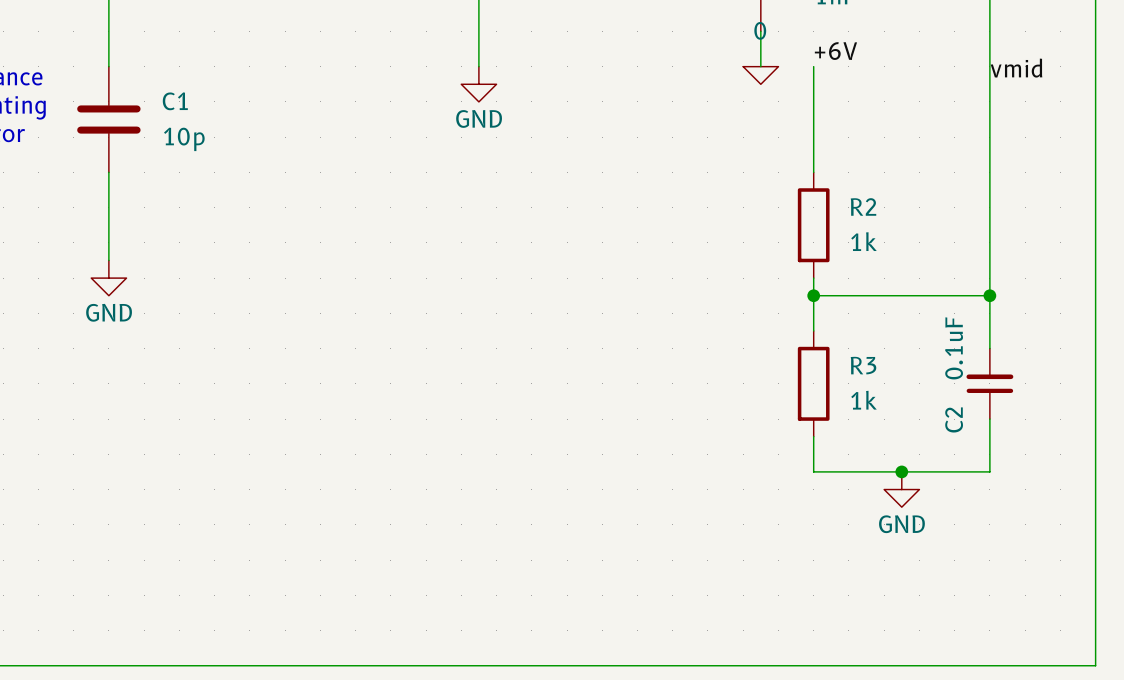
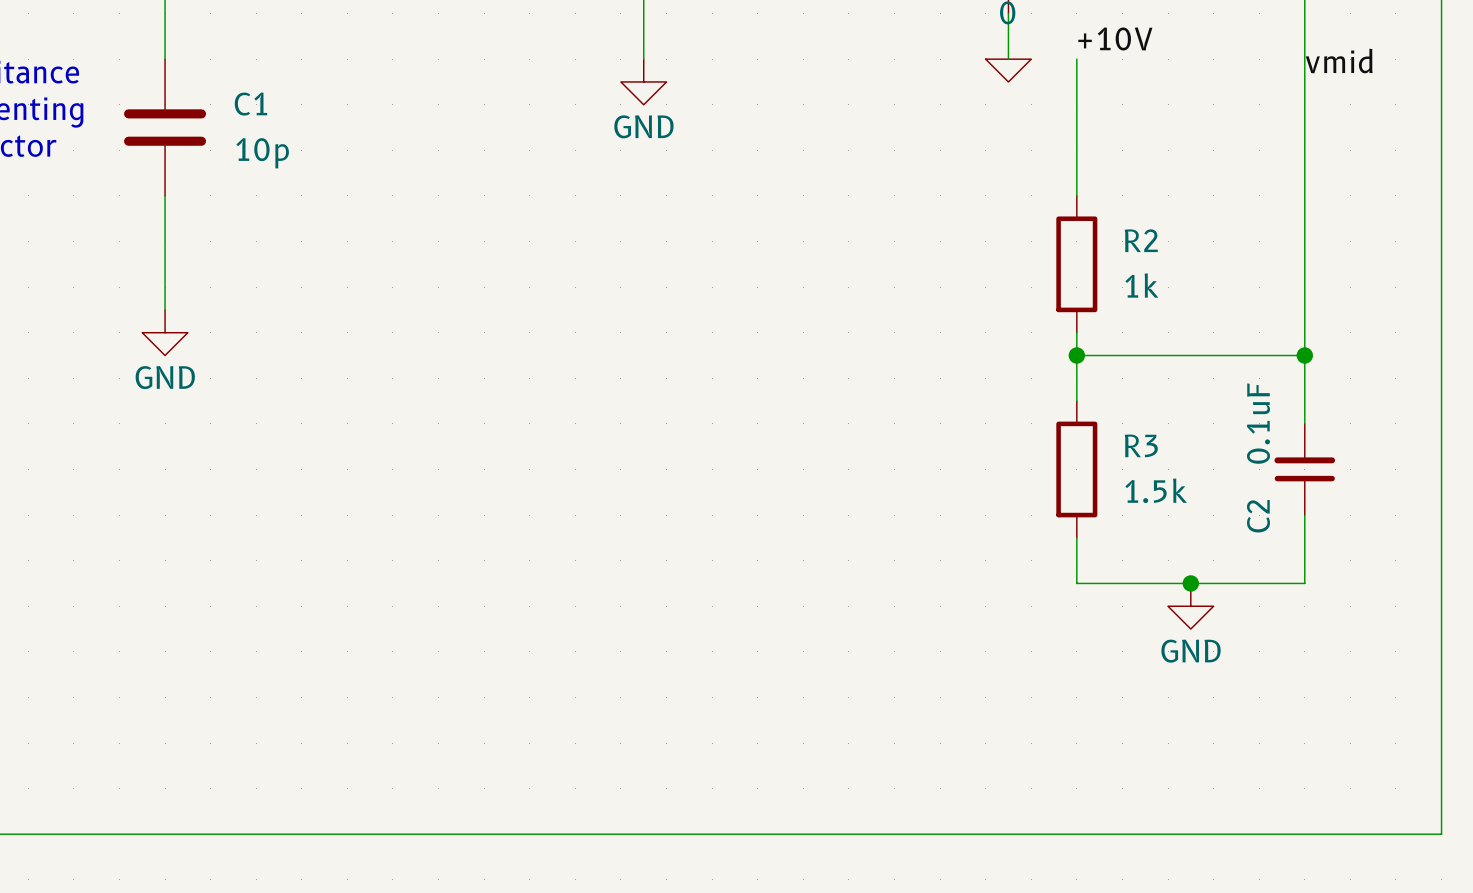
label: +6V (835, 51) -> +10V (1115, 38)
R3 value: 1k (863, 400) -> 1.5k (1156, 490)

